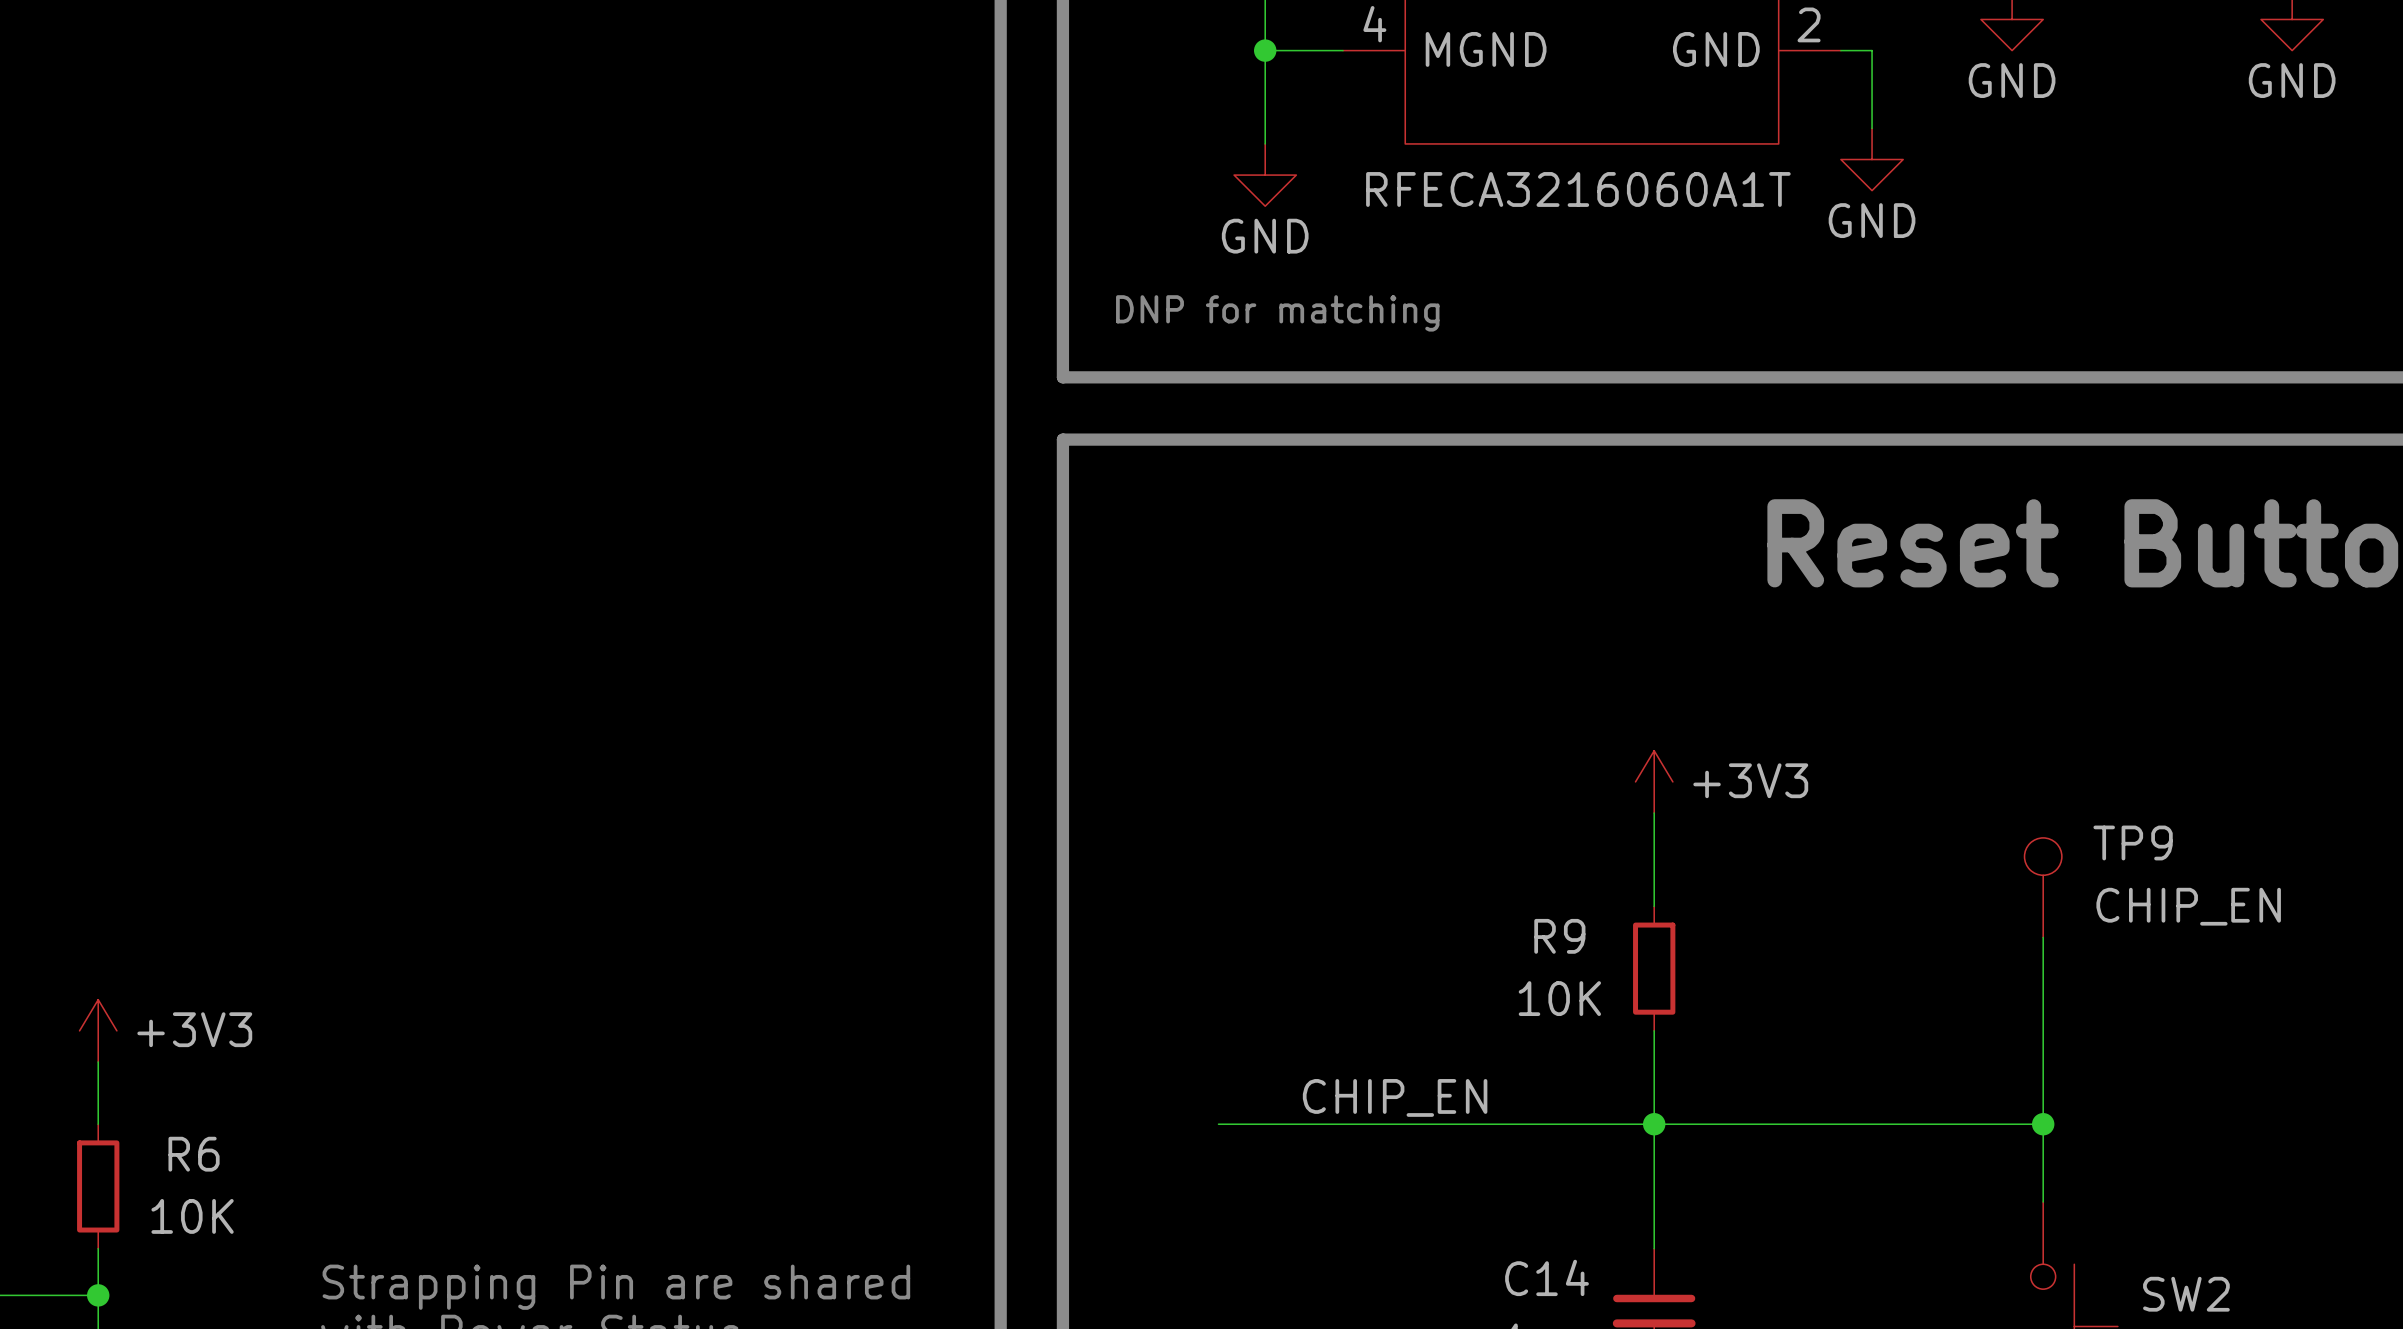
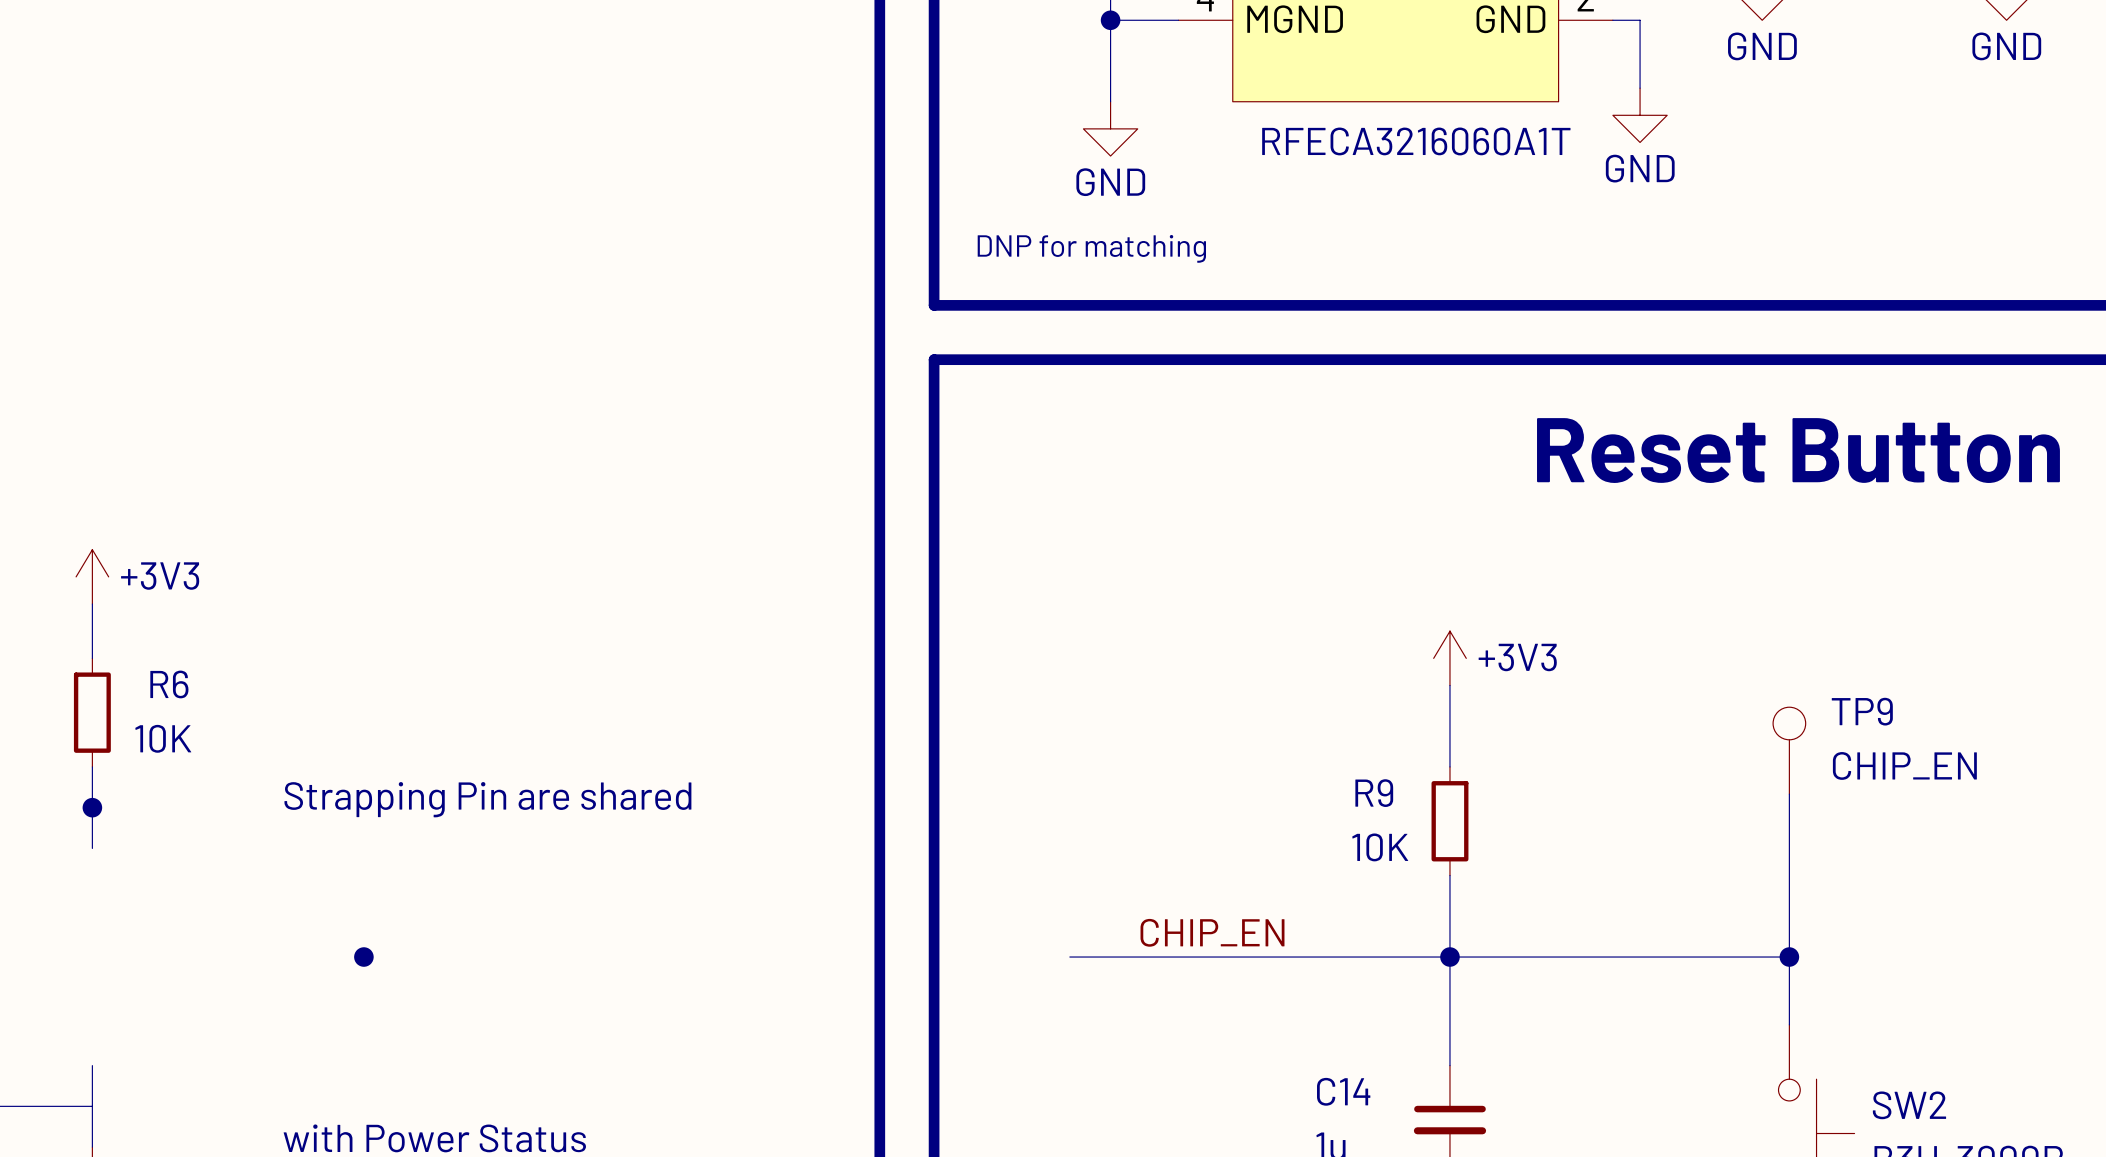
power symbol: none -> +3V3 (92, 576)
wire: none -> (92, 766) (92, 848)
junction: none -> (92, 807)
power symbol: +3V3 (98, 1030) -> none
wire: (98, 1061) (98, 1124) -> (92, 604) (92, 658)
junction: none -> (363, 957)
R6 position: (98, 1186) -> (92, 712)
text position: Strapping Pin are shared (616, 1287) -> Strapping Pin are shared (487, 799)
junction: (98, 1295) -> none

